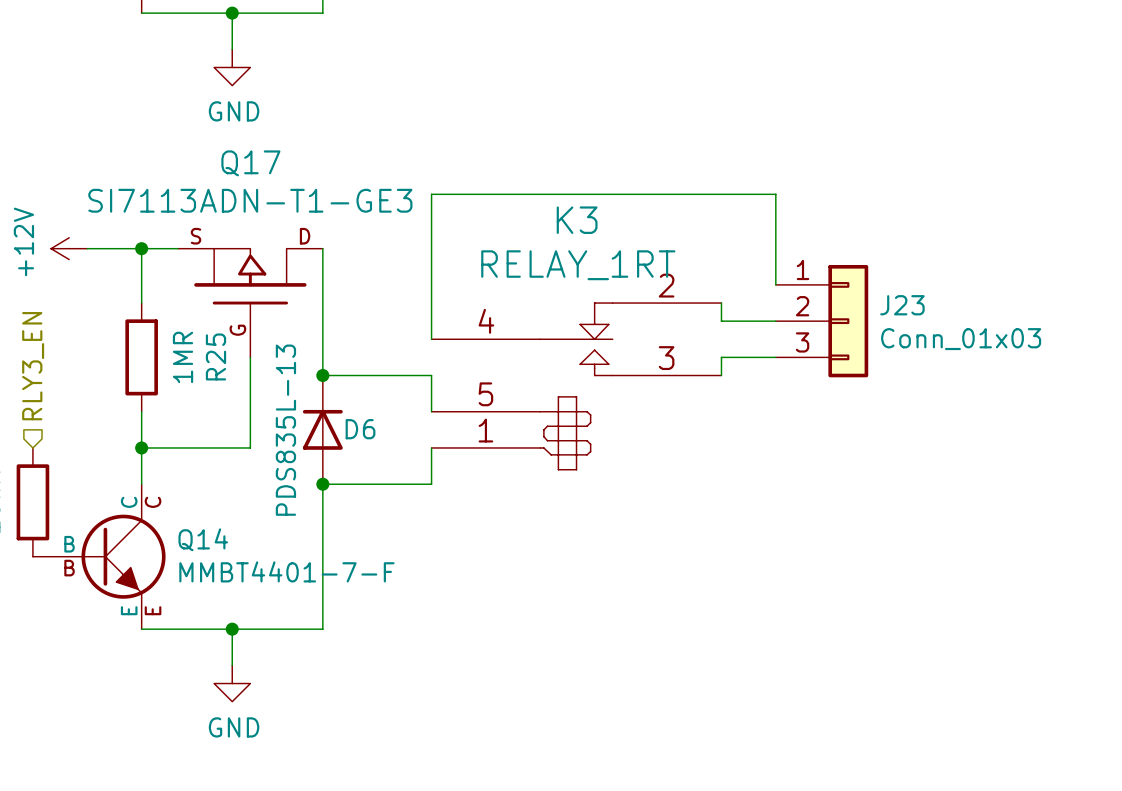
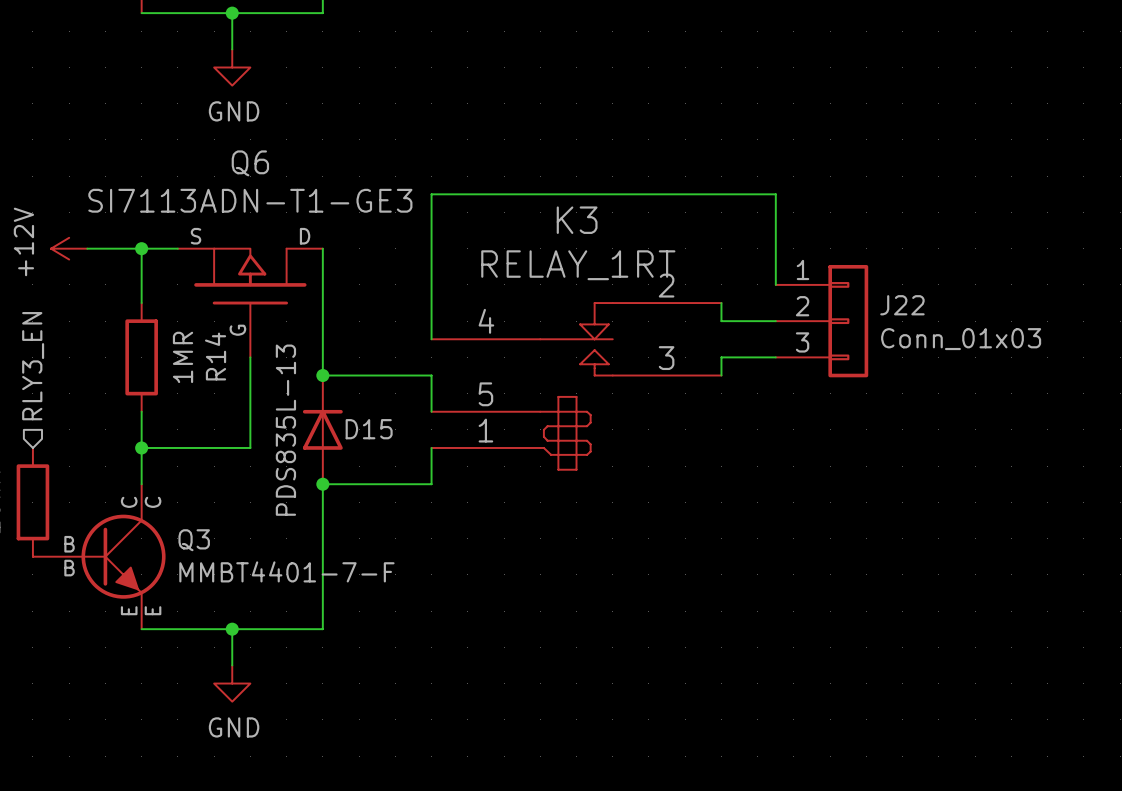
Q17 name: Q17 (250, 163) -> Q6 (250, 163)
J23 name: J23 (902, 305) -> J22 (902, 305)
R25 name: R25 (215, 356) -> R14 (215, 356)
D6 name: D6 (360, 429) -> D15 (369, 429)
Q14 name: Q14 (203, 539) -> Q3 (194, 540)

